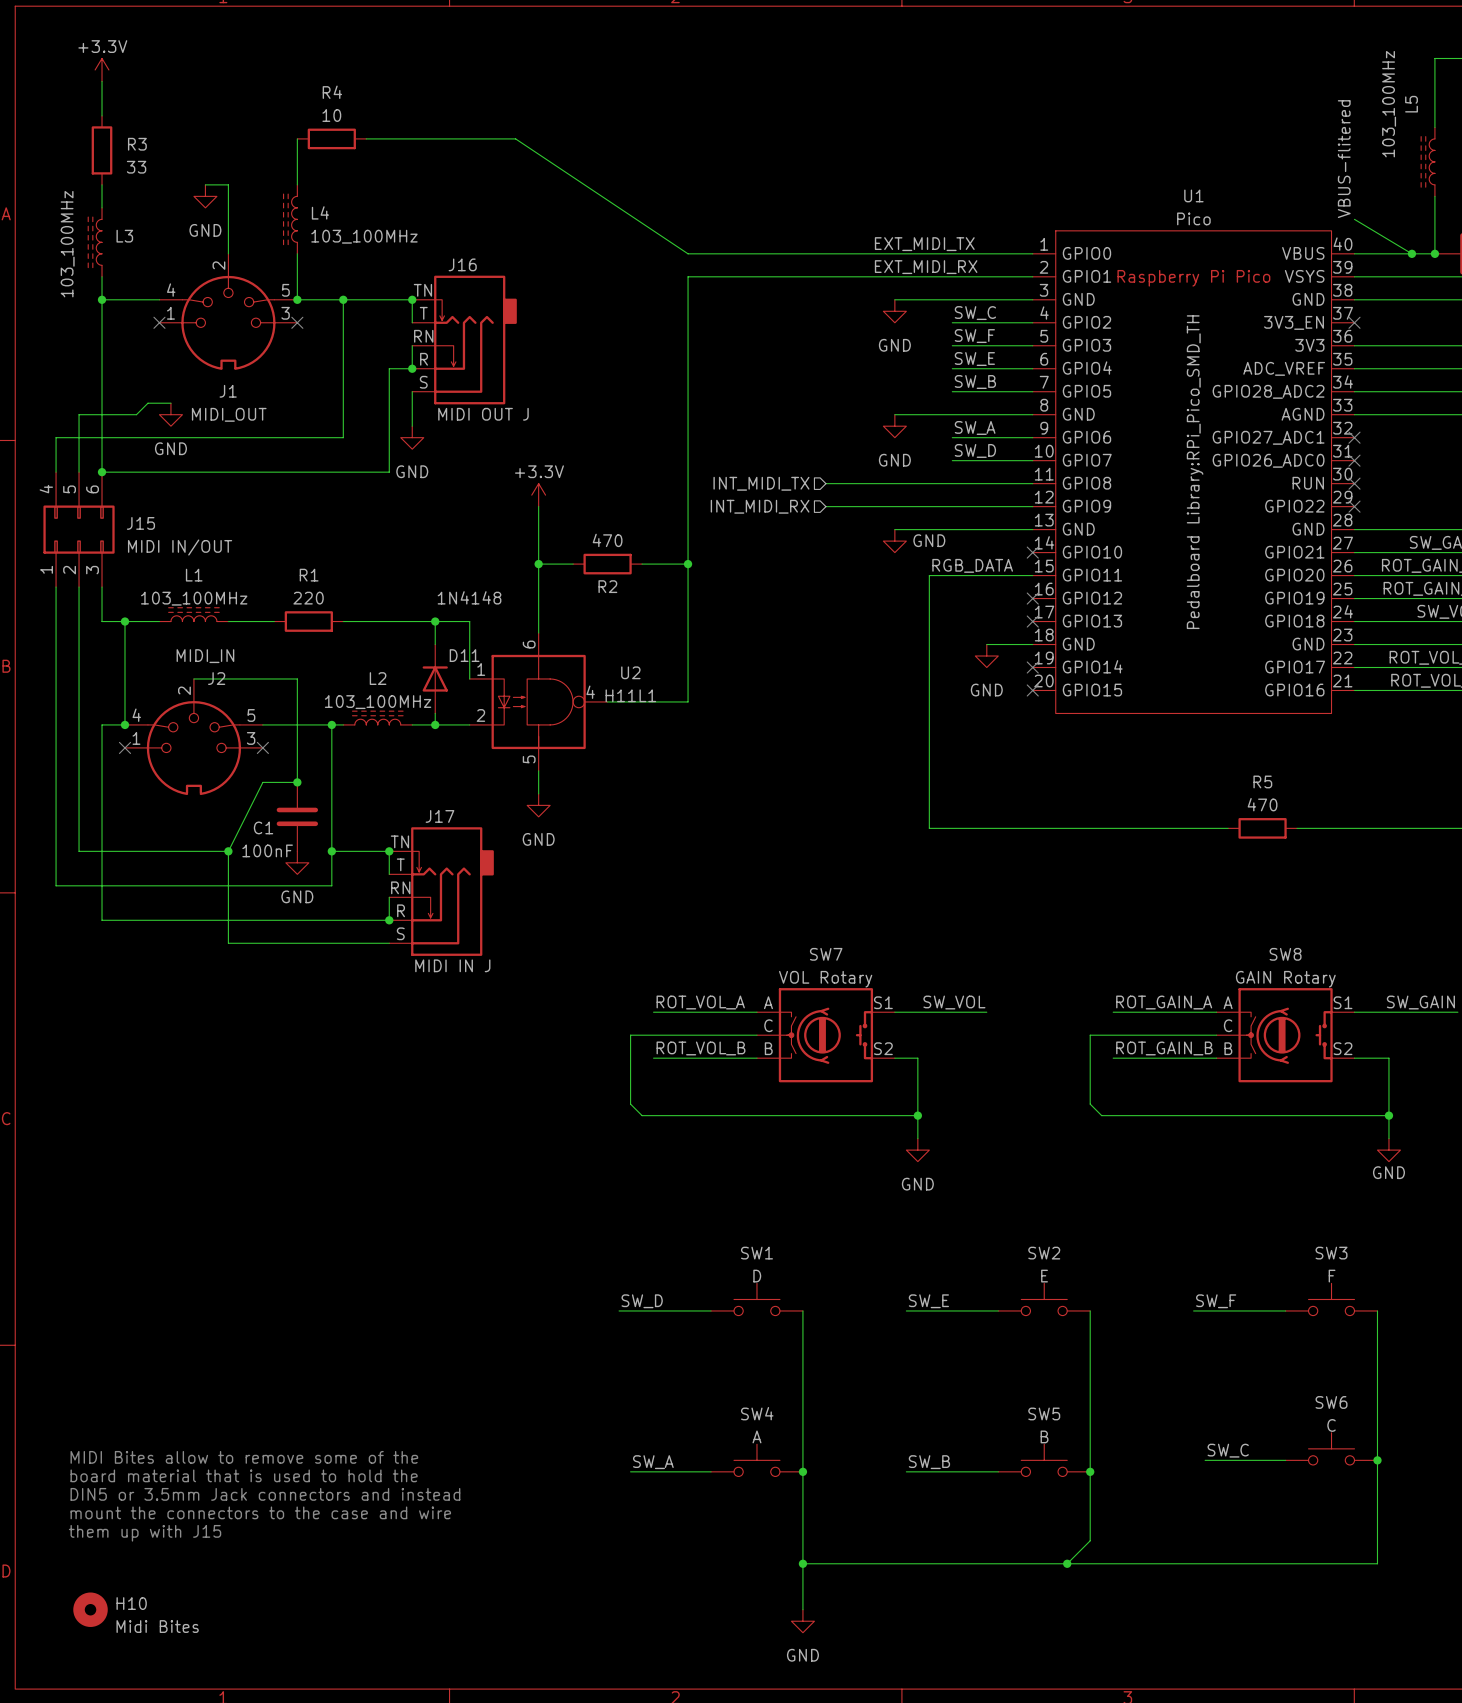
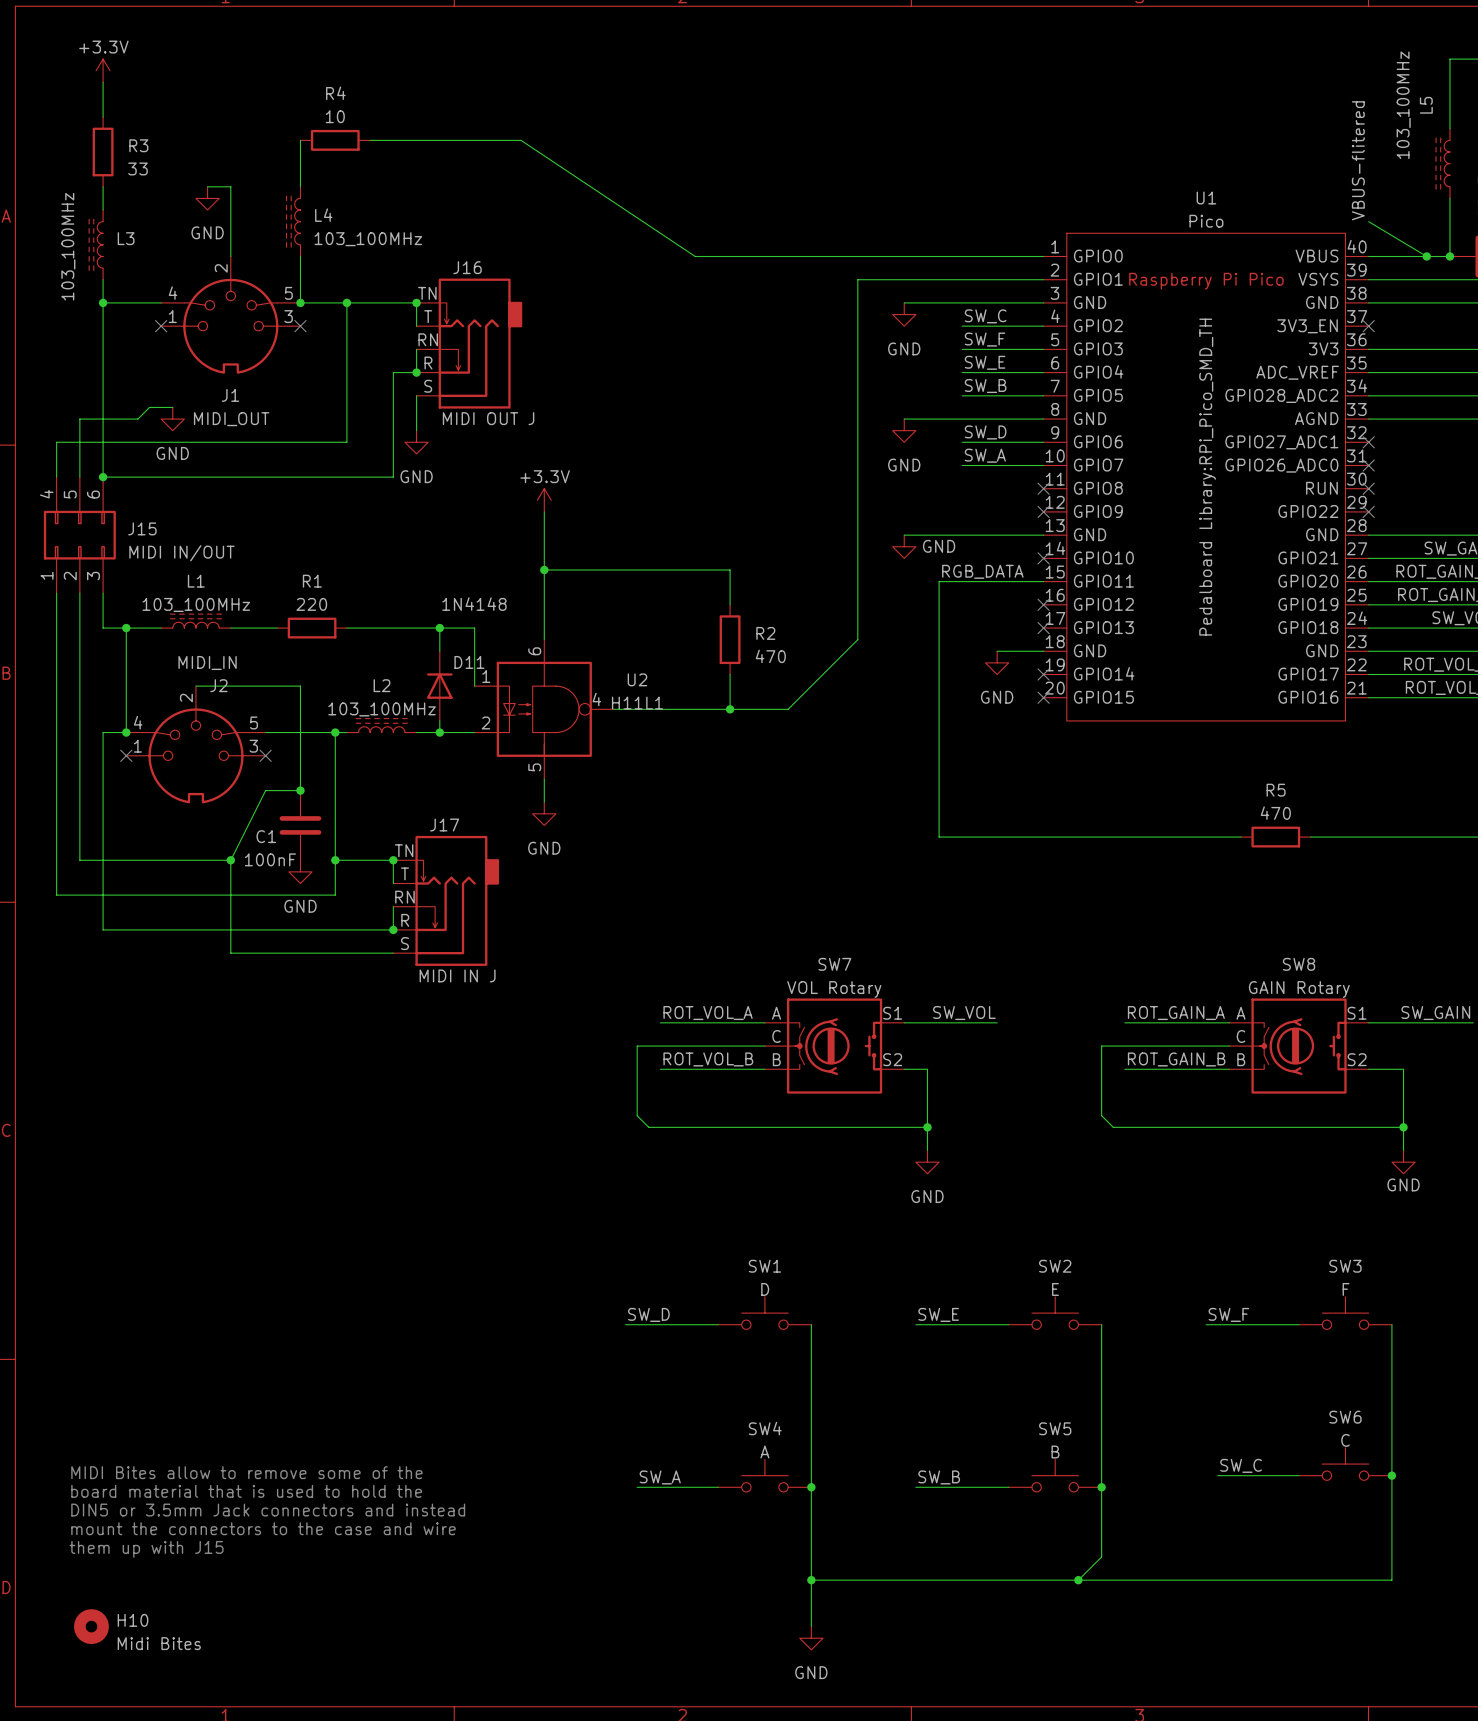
label: EXT_MIDI_TX (924, 244) -> none
label: EXT_MIDI_RX (926, 267) -> none
wire: (848, 276) (688, 276) (688, 701) -> (857, 279) (857, 639) (788, 709) (695, 709)
label: SW_A (975, 427) -> SW_D (985, 432)
label: SW_D (975, 450) -> SW_A (985, 455)
hierarchical label: INT_MIDI_TX (761, 483) -> none
wire: (825, 483) (1032, 483) -> none
no-connect mark: none -> (1043, 488)
hierarchical label: INT_MIDI_RX (760, 506) -> none
wire: (825, 506) (1032, 506) -> none
no-connect mark: none -> (1043, 511)
R2 value position: 470 (607, 540) -> 470 (770, 656)
wire: none -> (579, 569) (648, 569)
R2 rotation: 0° (607, 564) -> 90° clockwise (730, 639)
R2 position: (607, 564) -> (730, 639)
wire: none -> (695, 569) (730, 569) (730, 604)
junction: (688, 564) -> none
R2 name position: R2 (607, 586) -> R2 (765, 633)
wire: none -> (730, 674) (730, 709)
junction: none -> (730, 709)

